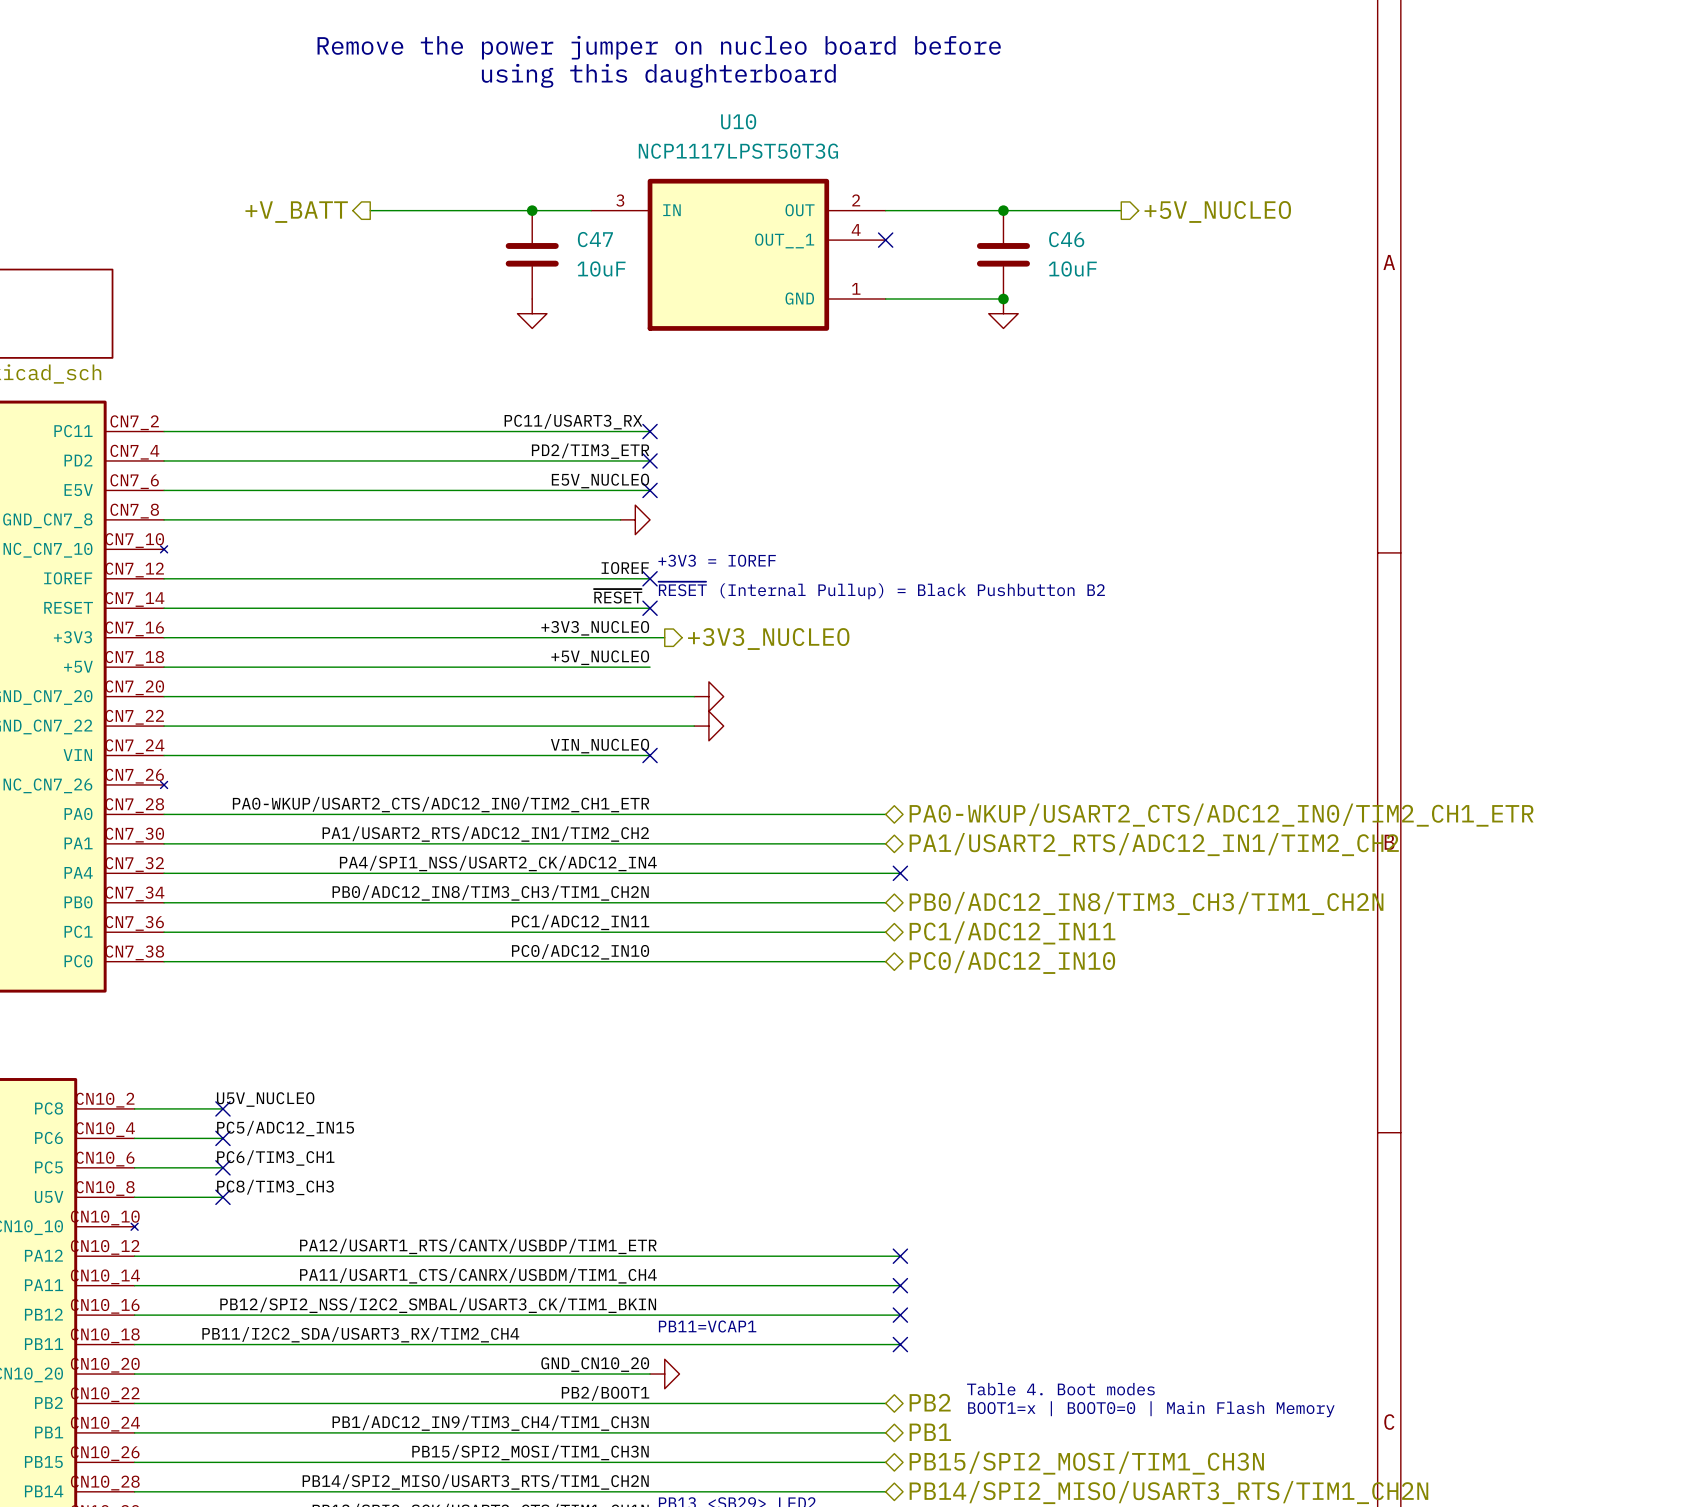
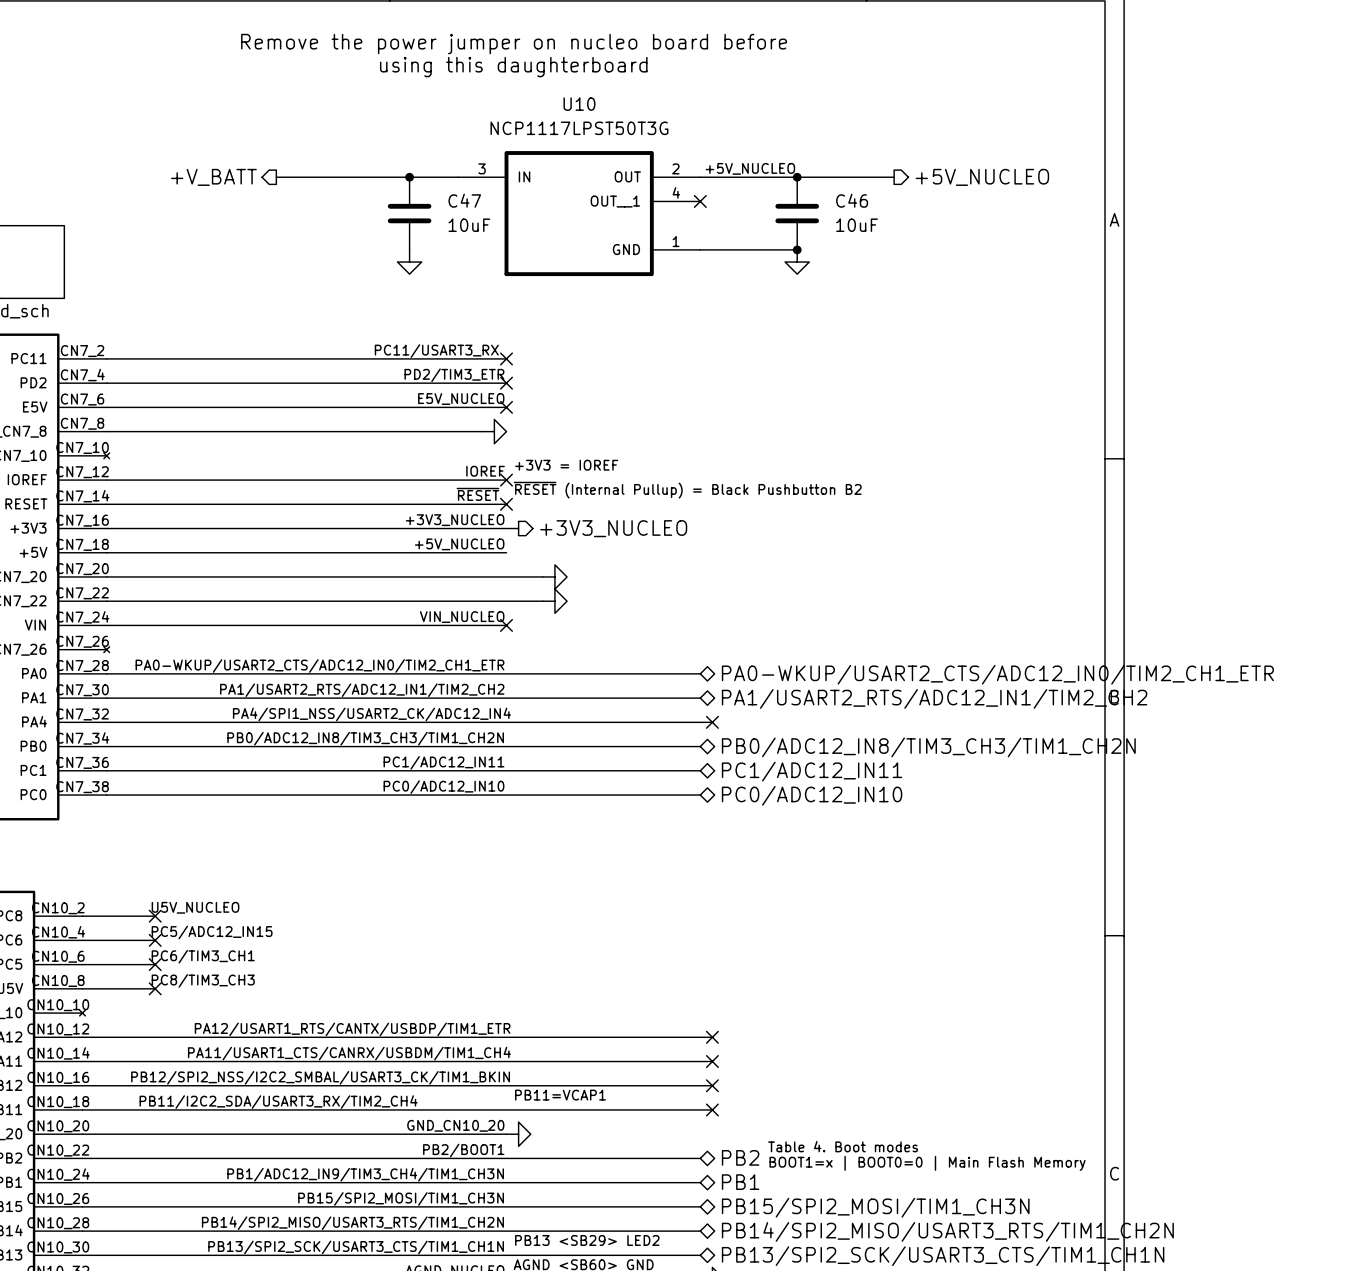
label: none -> +5V_NUCLEO (750, 168)

